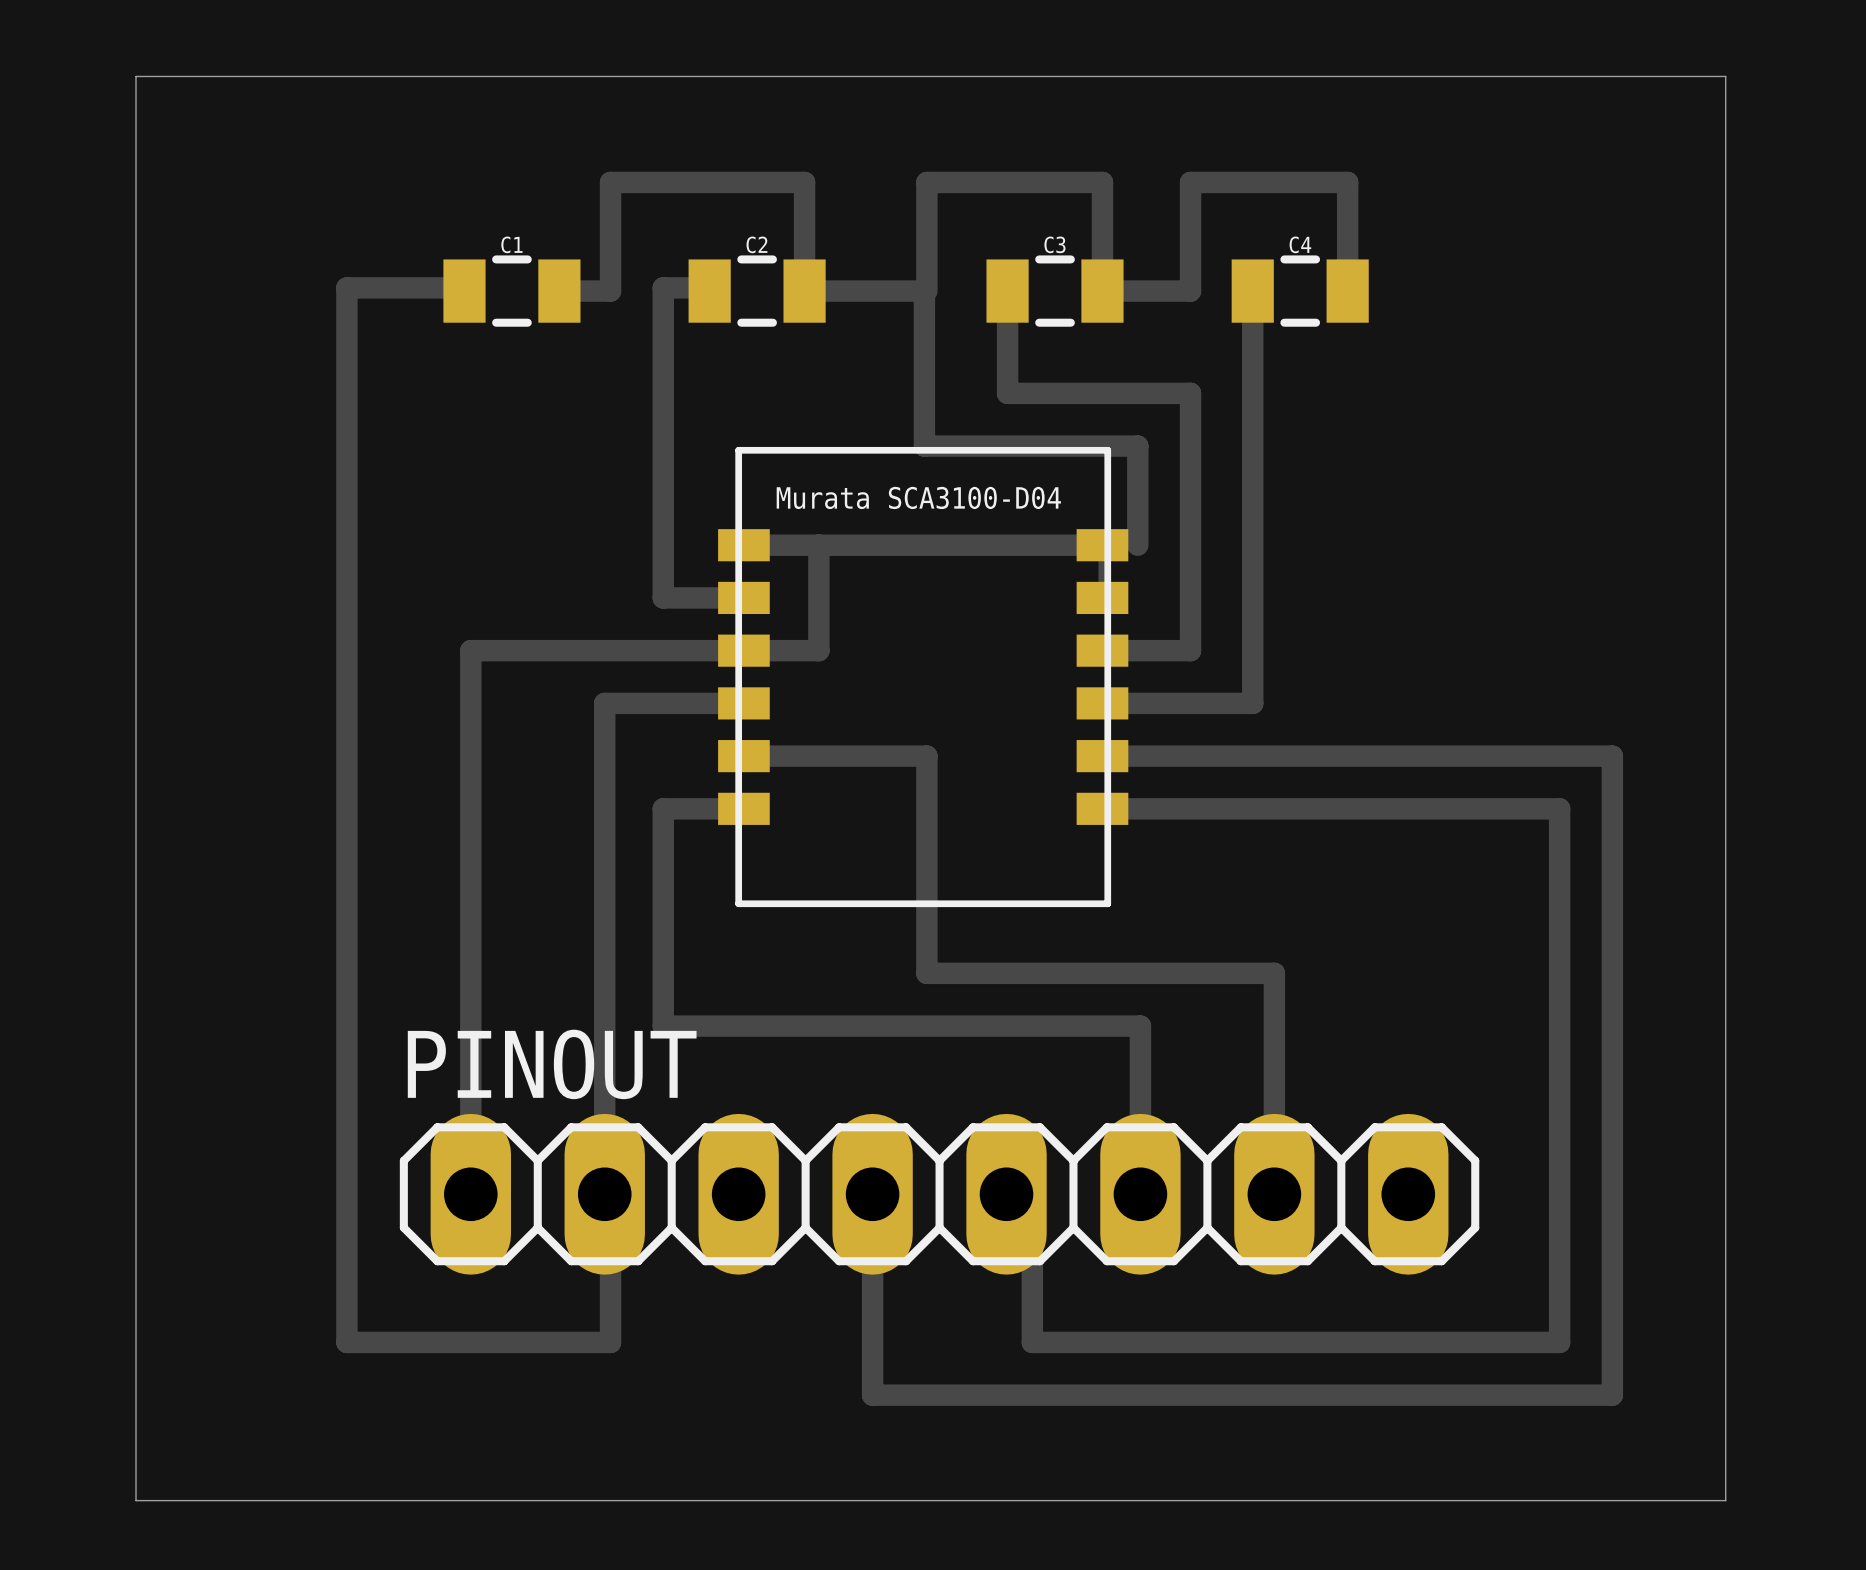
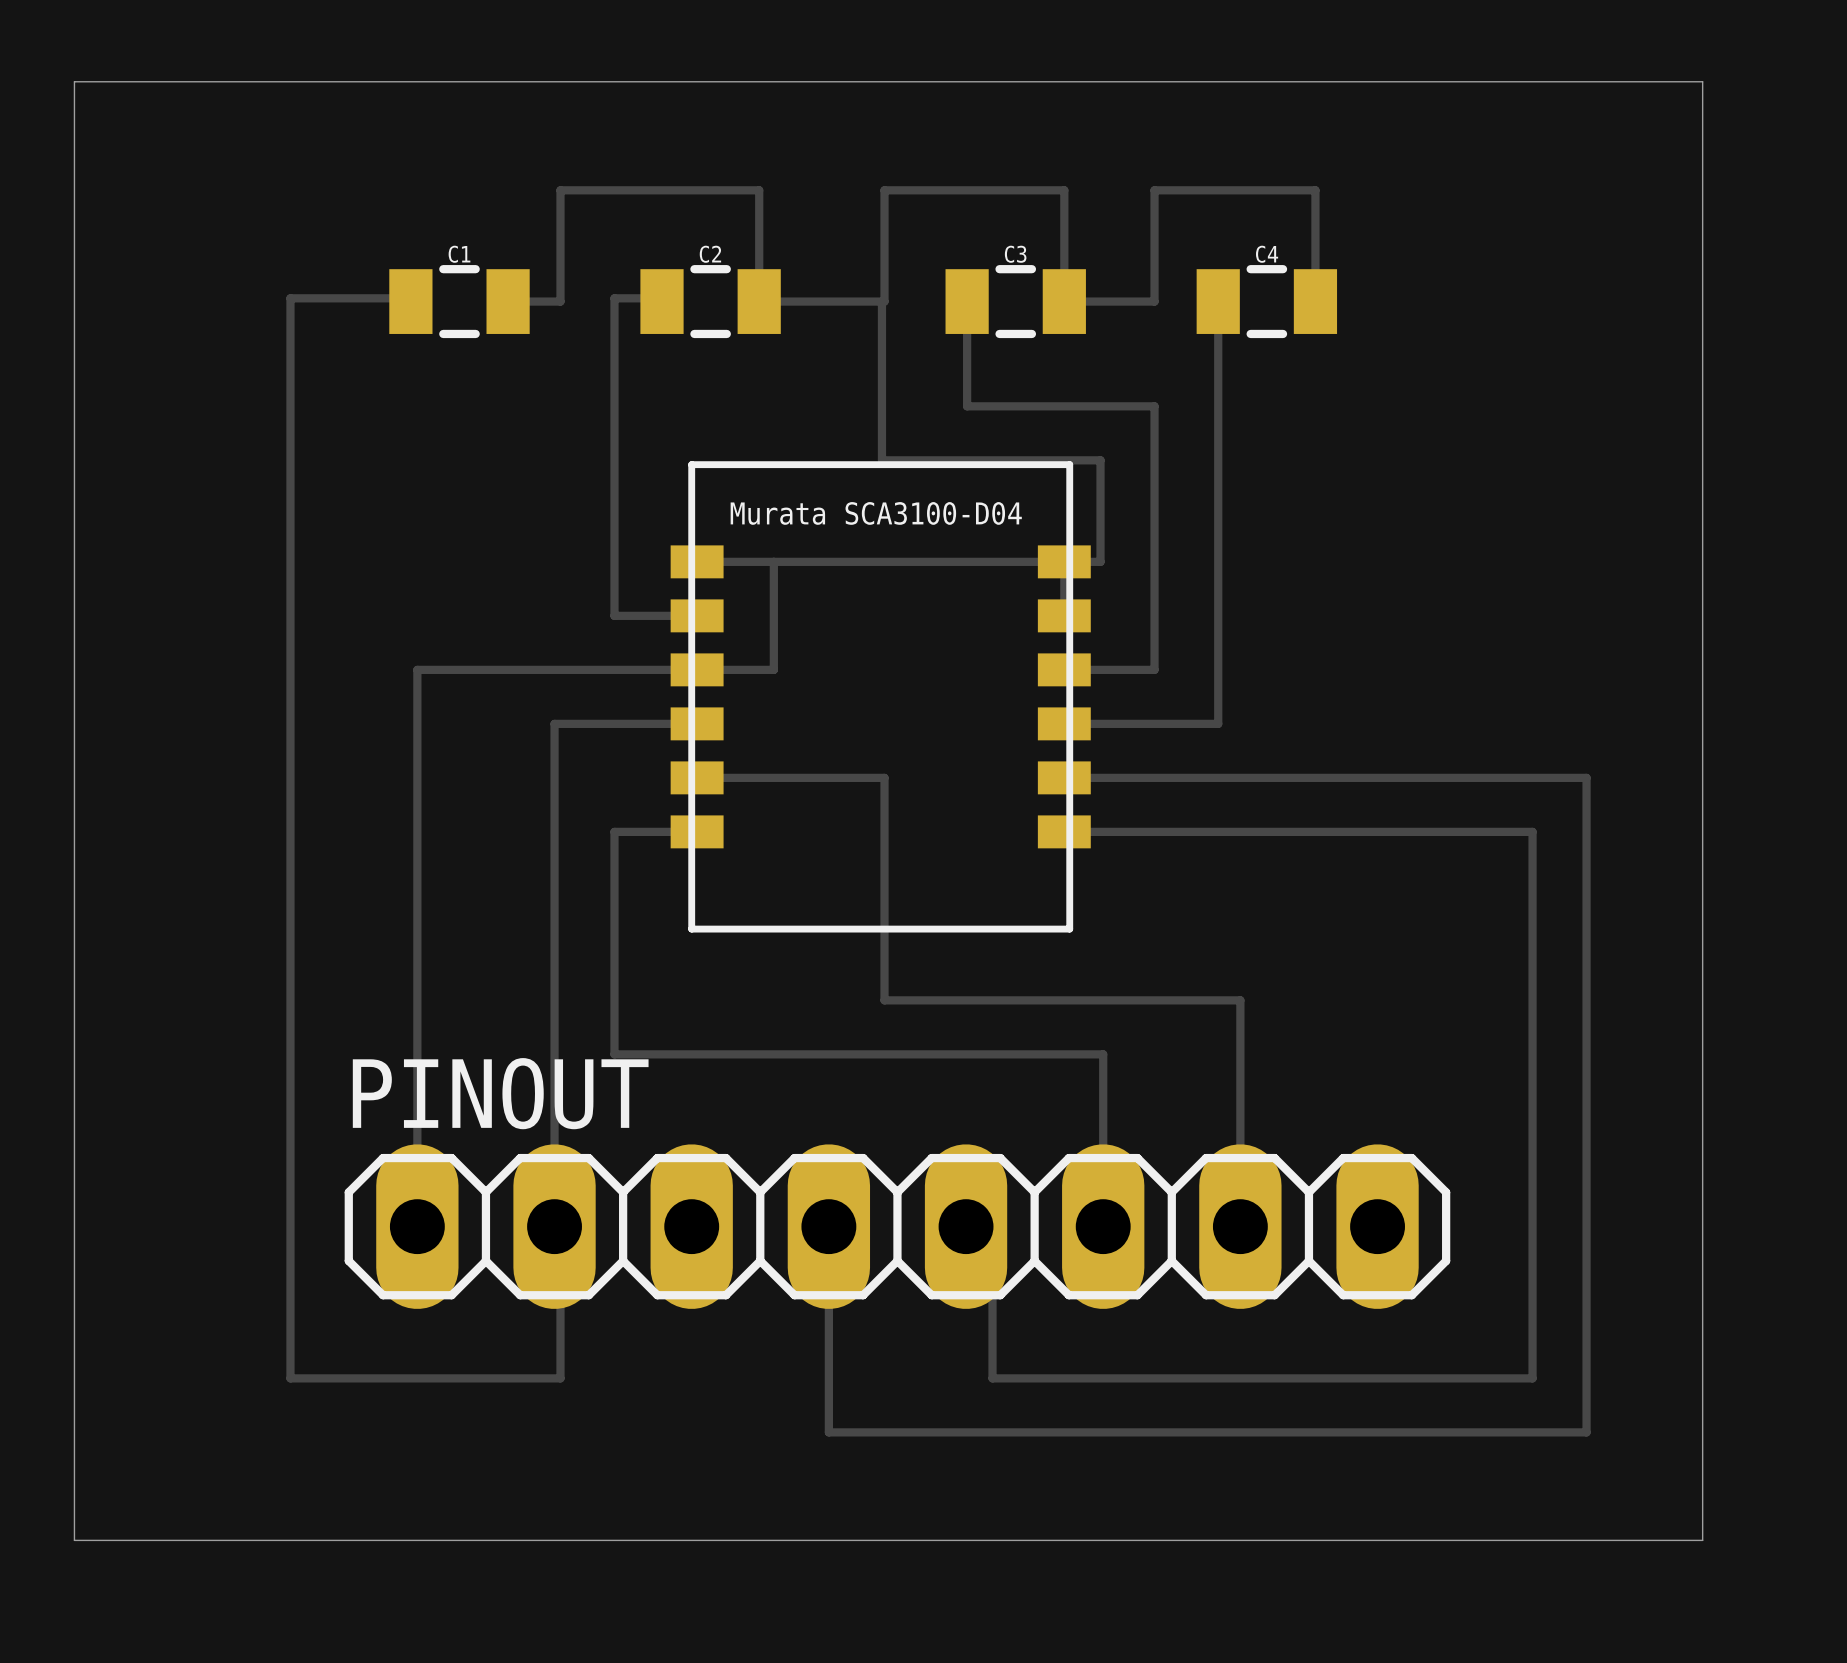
track width: thick (464, 287) (346, 287) (346, 1342) (610, 1342) (610, 1194) -> thin (410, 298) (290, 298) (290, 1378) (560, 1378) (560, 1226)
track width: thick (709, 287) (663, 287) (663, 597) (743, 597) -> thin (662, 298) (614, 298) (614, 615) (697, 615)
track width: thick (559, 291) (610, 291) (610, 182) (804, 182) (804, 291) (924, 291) (924, 446) (1137, 446) (1137, 545) -> thin (508, 301) (560, 301) (560, 190) (759, 190) (759, 301) (881, 301) (881, 460) (1100, 460) (1100, 561)
track width: thick (926, 291) (926, 182) (1102, 182) (1102, 291) (1190, 291) (1190, 182) (1347, 182) (1347, 291) -> thin (884, 301) (884, 190) (1064, 190) (1064, 301) (1154, 301) (1154, 190) (1315, 190) (1315, 301)
track width: thick (1007, 291) (1007, 393) (1190, 393) (1190, 650) (1102, 650) -> thin (967, 301) (967, 406) (1154, 406) (1154, 669) (1064, 669)
track width: thick (1252, 291) (1252, 703) (1102, 703) -> thin (1218, 301) (1218, 723) (1064, 723)
track width: thick (743, 545) (1102, 545) -> thin (697, 561) (1064, 561)
track width: thick (818, 545) (818, 650) (470, 650) (470, 1194) -> thin (773, 561) (773, 669) (417, 669) (417, 1226)
track width: thick (743, 703) (604, 703) (604, 1194) -> thin (697, 723) (554, 723) (554, 1226)
track width: thick (743, 756) (926, 756) (926, 973) (1274, 973) (1274, 1194) -> thin (697, 777) (884, 777) (884, 1000) (1240, 1000) (1240, 1226)
track width: thick (1102, 756) (1612, 756) (1612, 1395) (872, 1395) (872, 1194) -> thin (1064, 777) (1586, 777) (1586, 1432) (828, 1432) (828, 1226)
track width: thick (743, 808) (663, 808) (663, 1026) (1140, 1026) (1140, 1194) -> thin (697, 831) (614, 831) (614, 1054) (1103, 1054) (1103, 1226)
track width: thick (1102, 808) (1559, 808) (1559, 1342) (1032, 1342) (1032, 1194) -> thin (1064, 831) (1532, 831) (1532, 1378) (992, 1378) (992, 1226)

